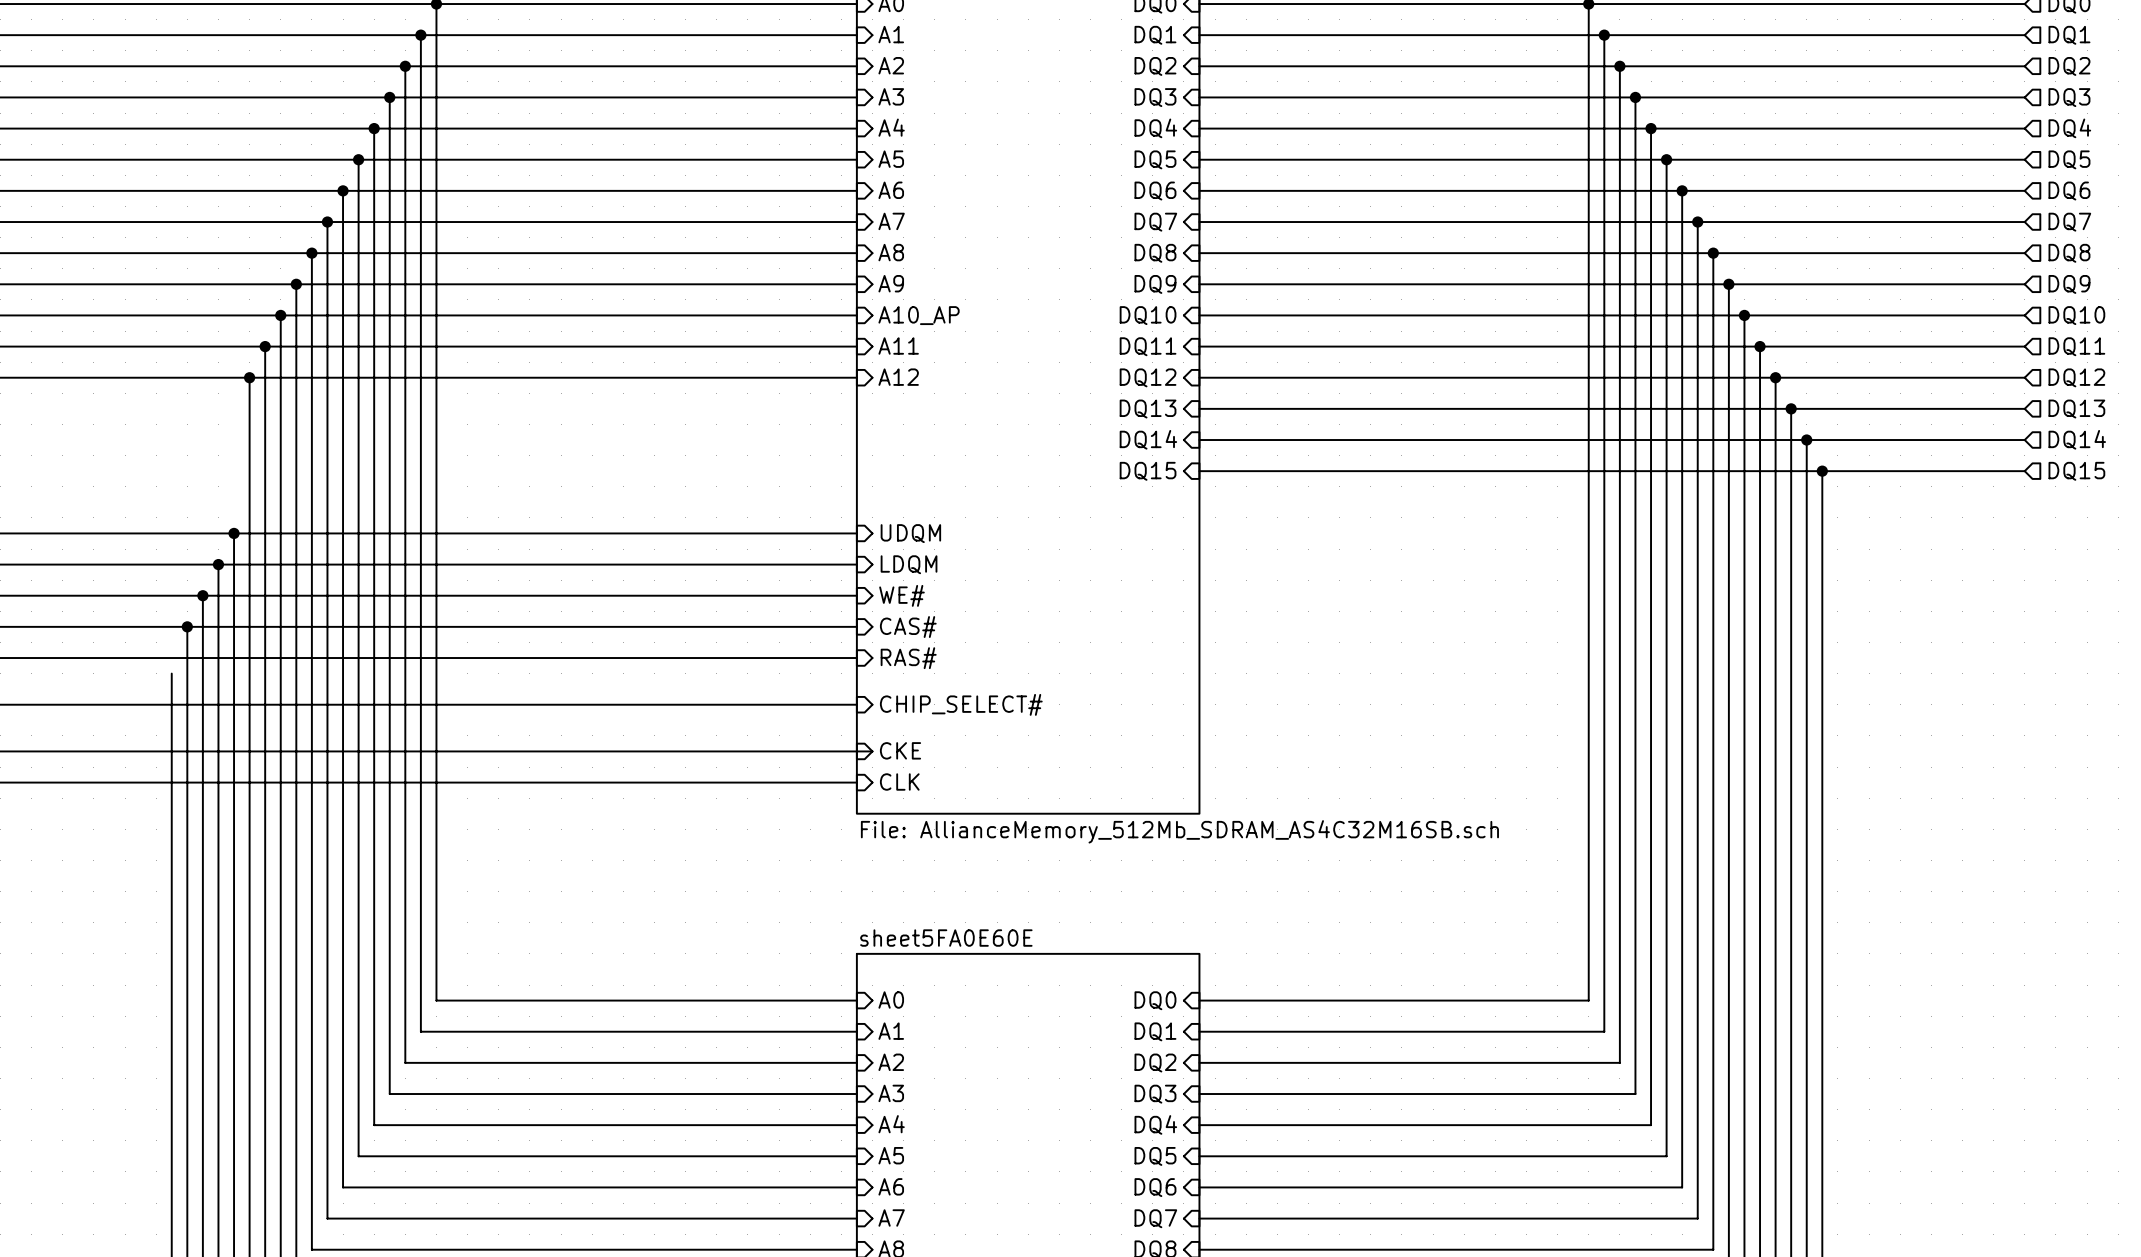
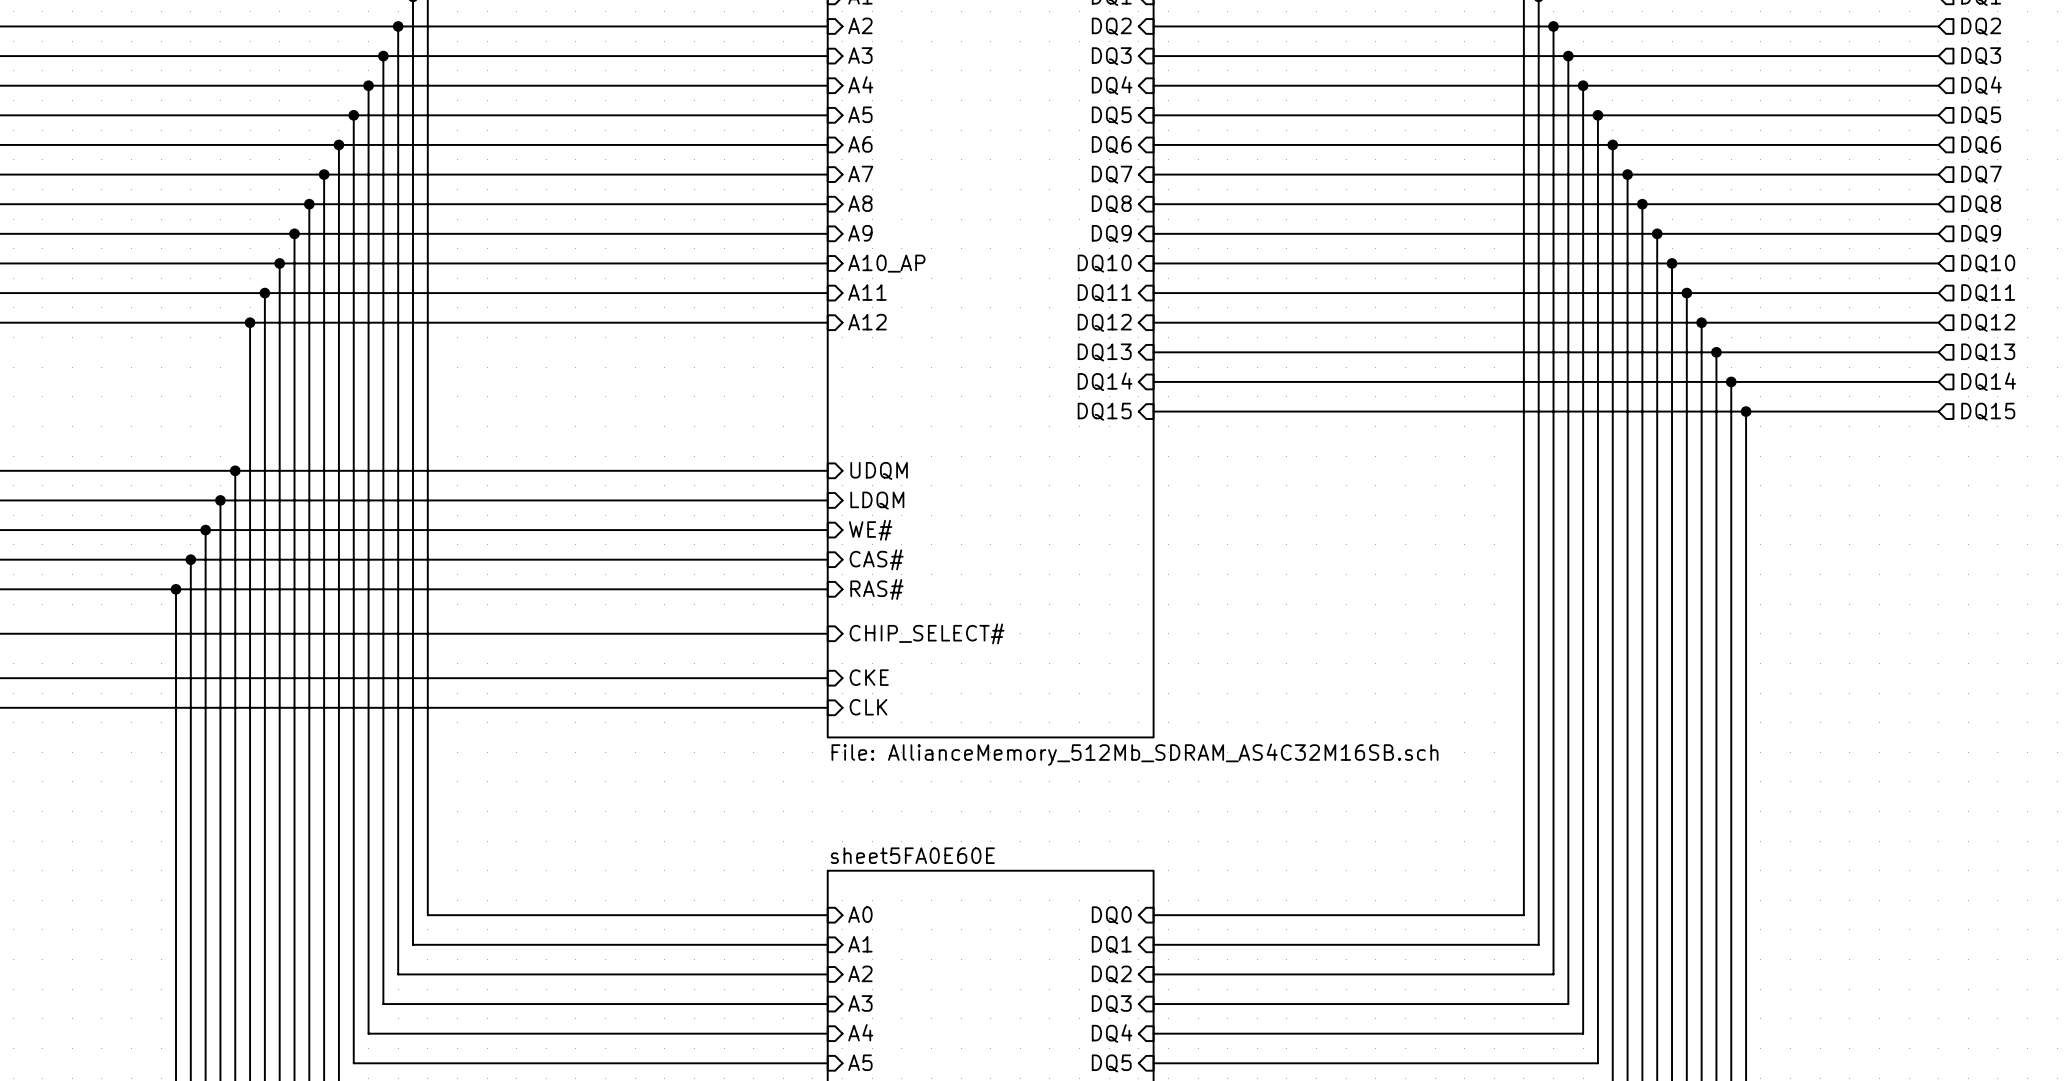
wire: none -> (176, 589) (176, 604)
junction: none -> (176, 589)
wire: (856, 751) (872, 751) -> none

